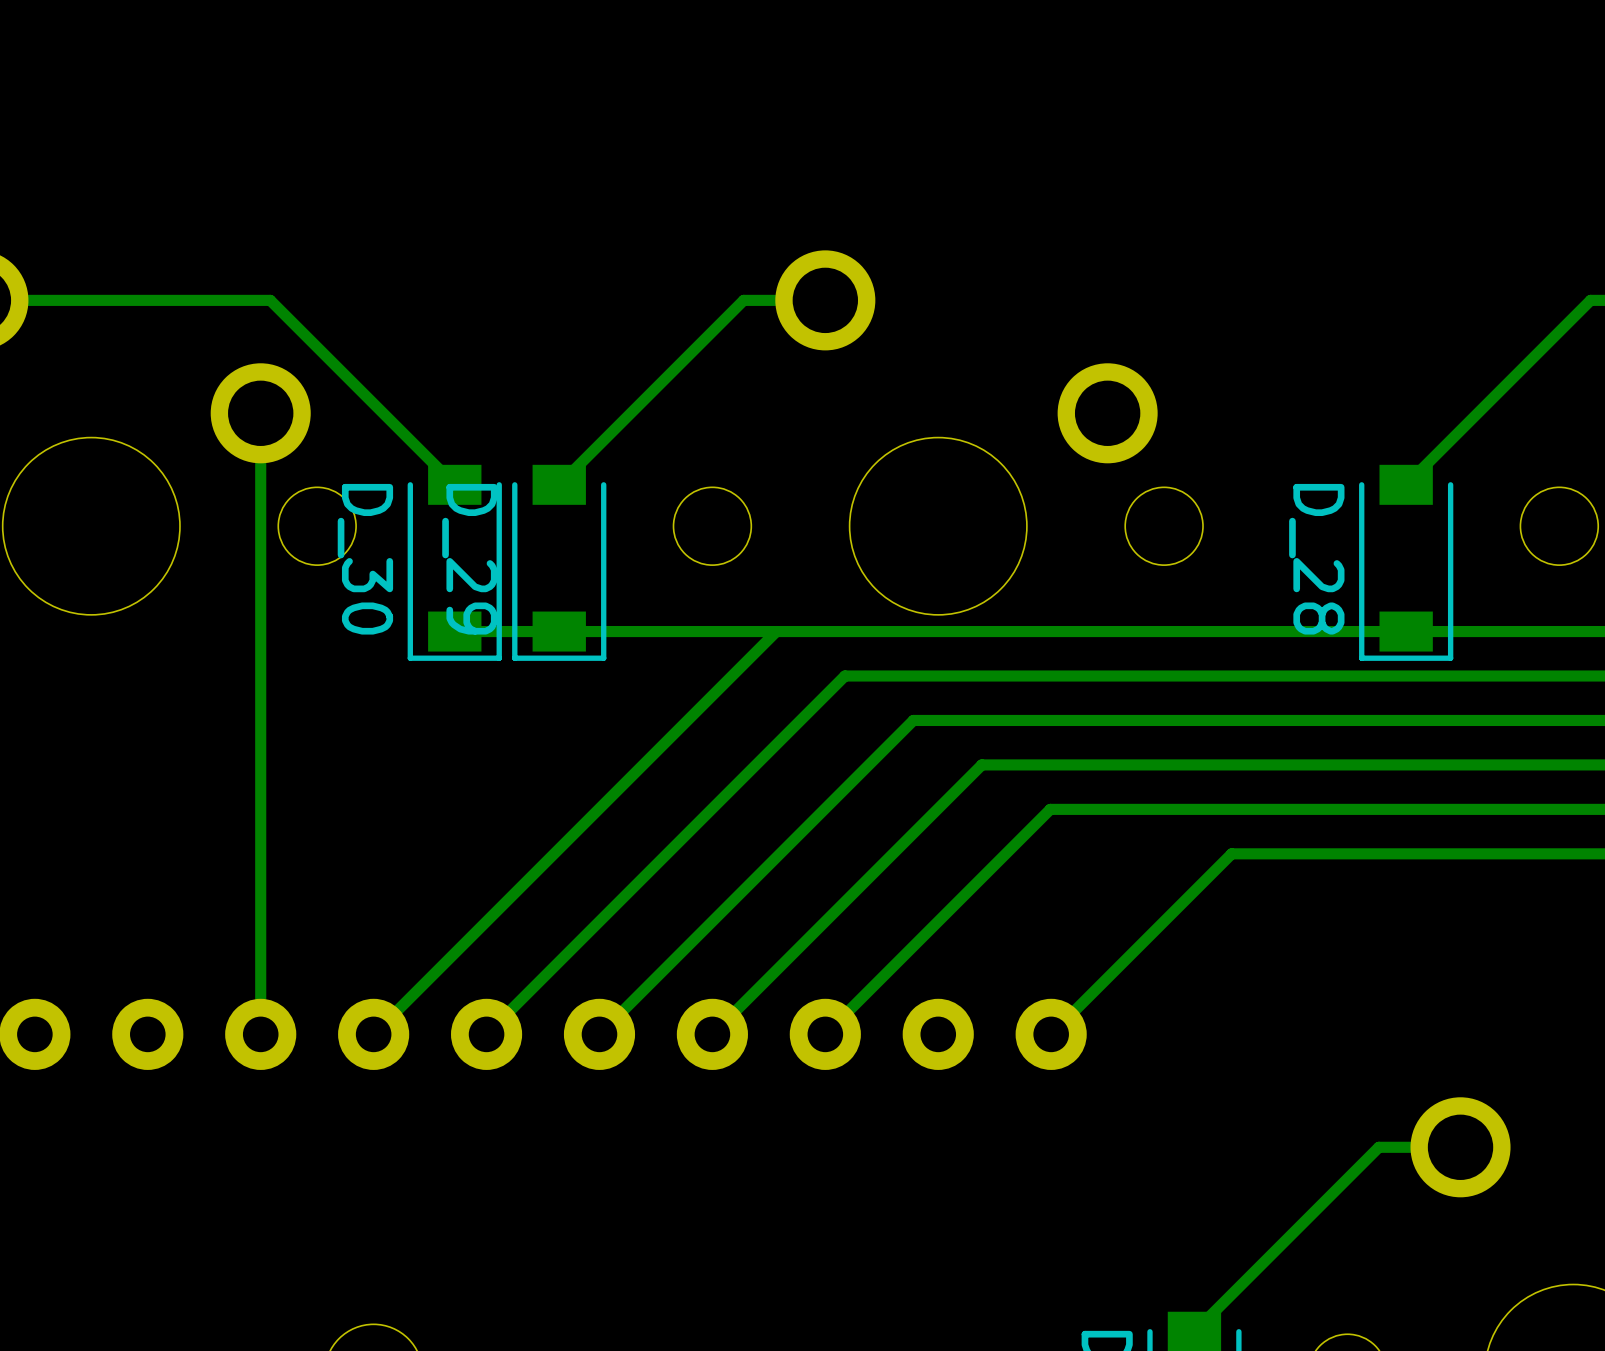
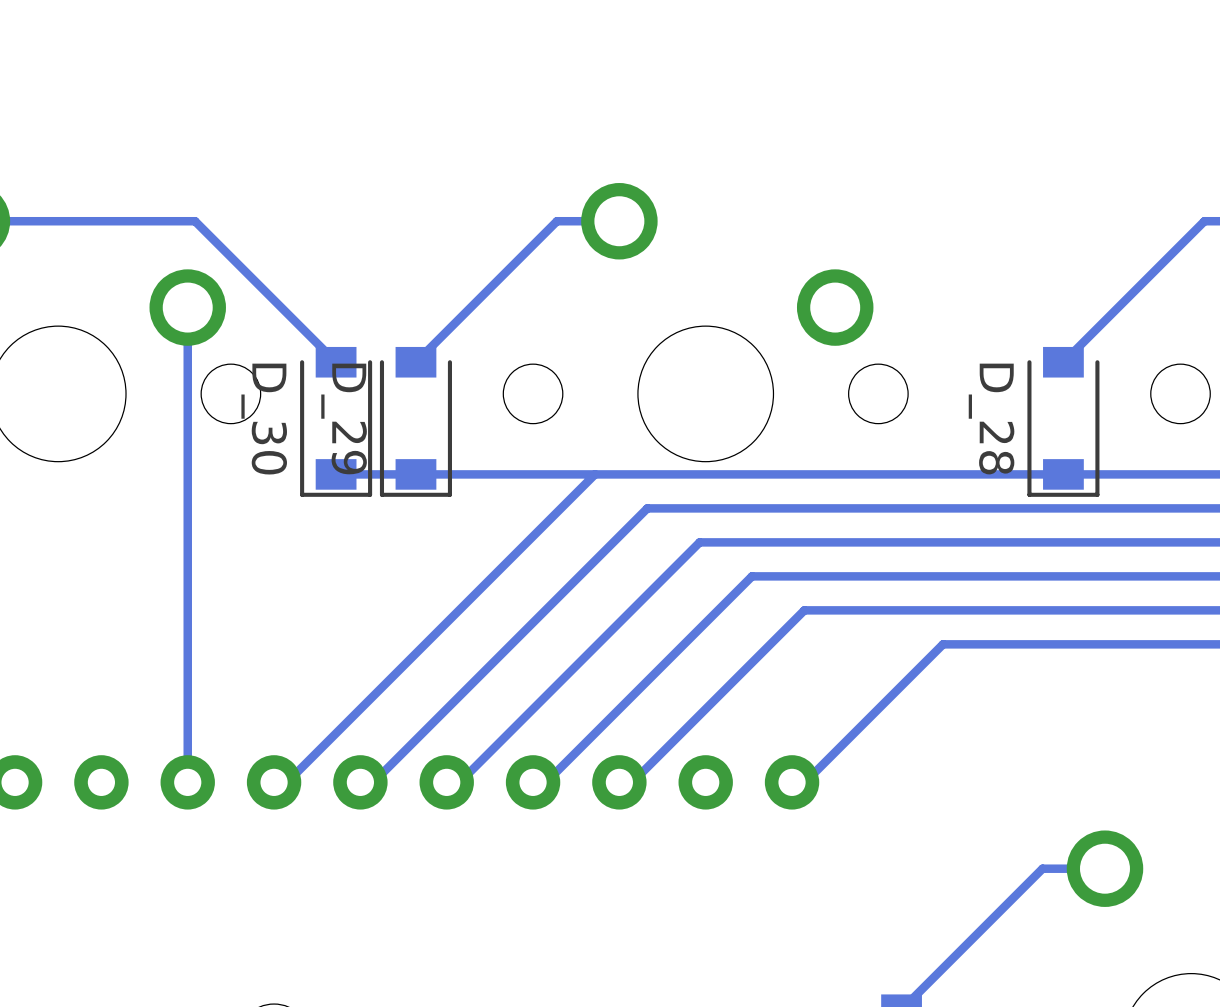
track: (776, 631) (373, 1034) -> none
track: none -> (594, 474) (274, 795)
track: (861, 676) (844, 676) (486, 1034) -> (647, 508) (360, 795)
track: (930, 720) (913, 720) (599, 1034) -> (699, 542) (446, 795)
track: (998, 764) (981, 764) (712, 1034) -> (752, 576) (533, 795)
track: (1067, 809) (1050, 809) (825, 1034) -> (804, 610) (619, 795)
track: (1248, 853) (1231, 853) (1051, 1034) -> (943, 644) (792, 795)

